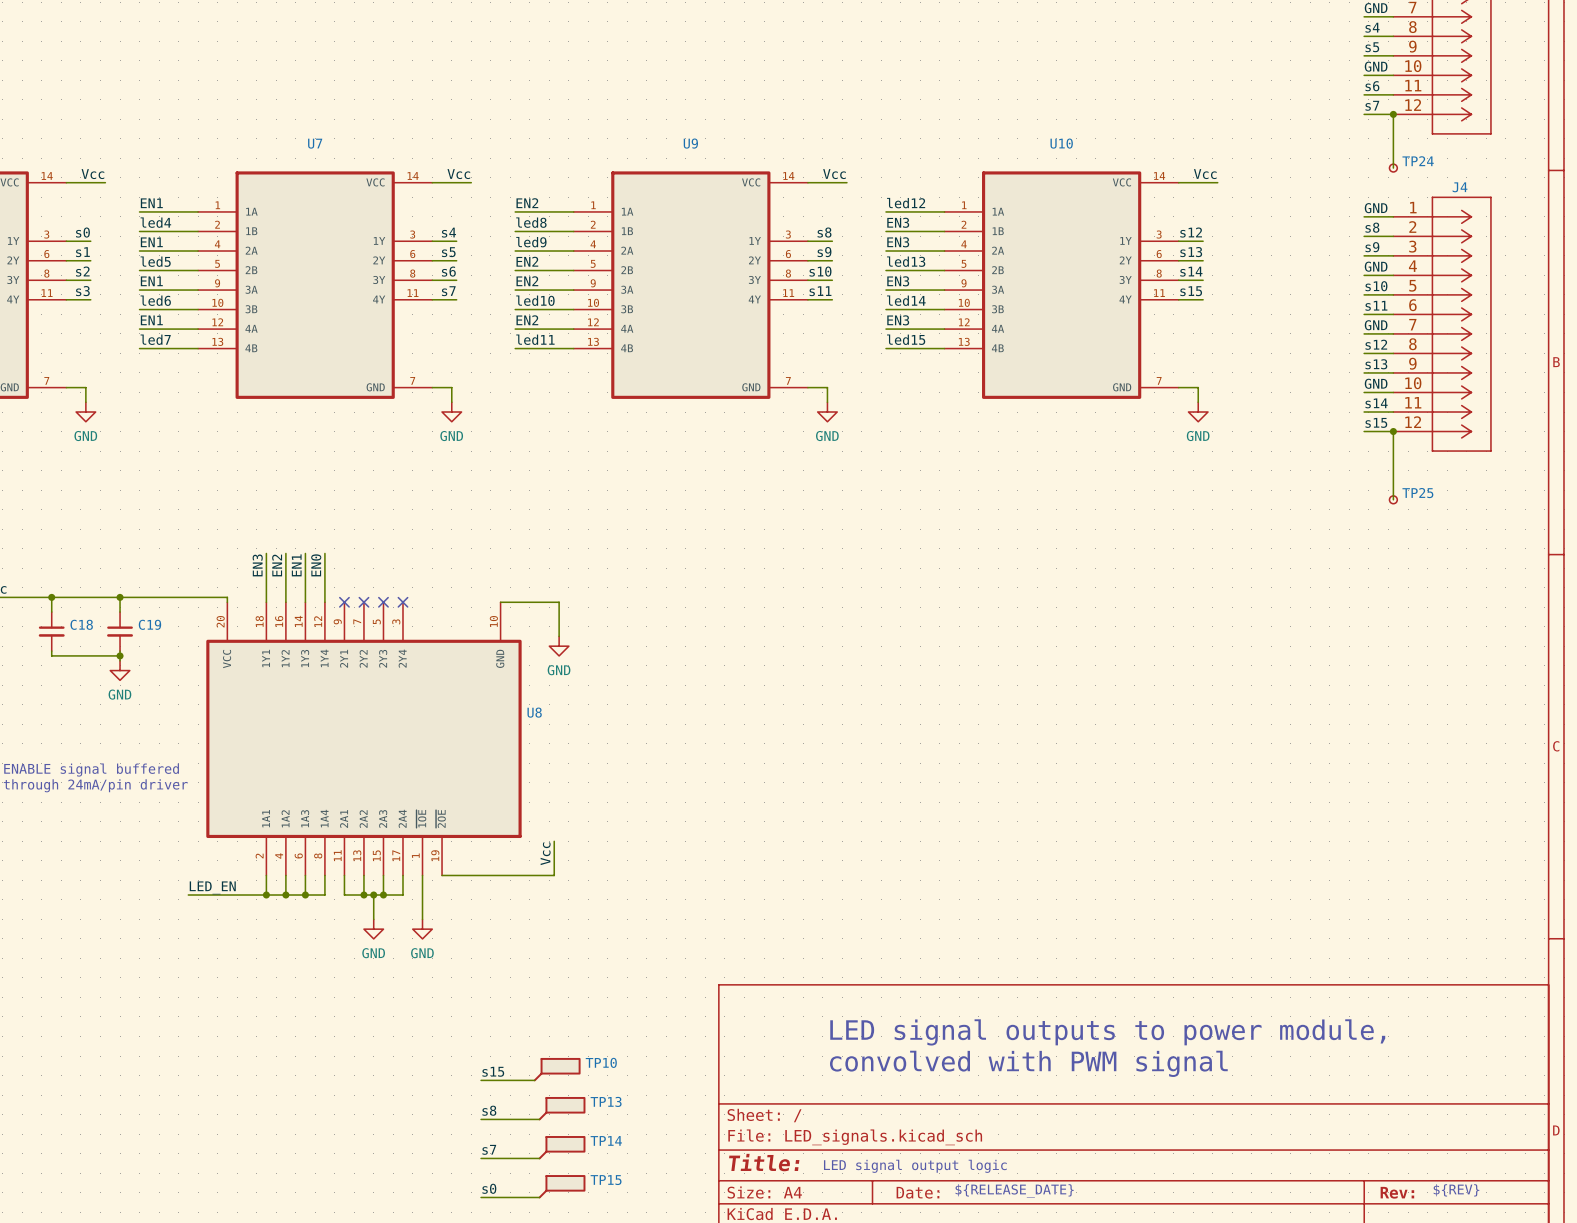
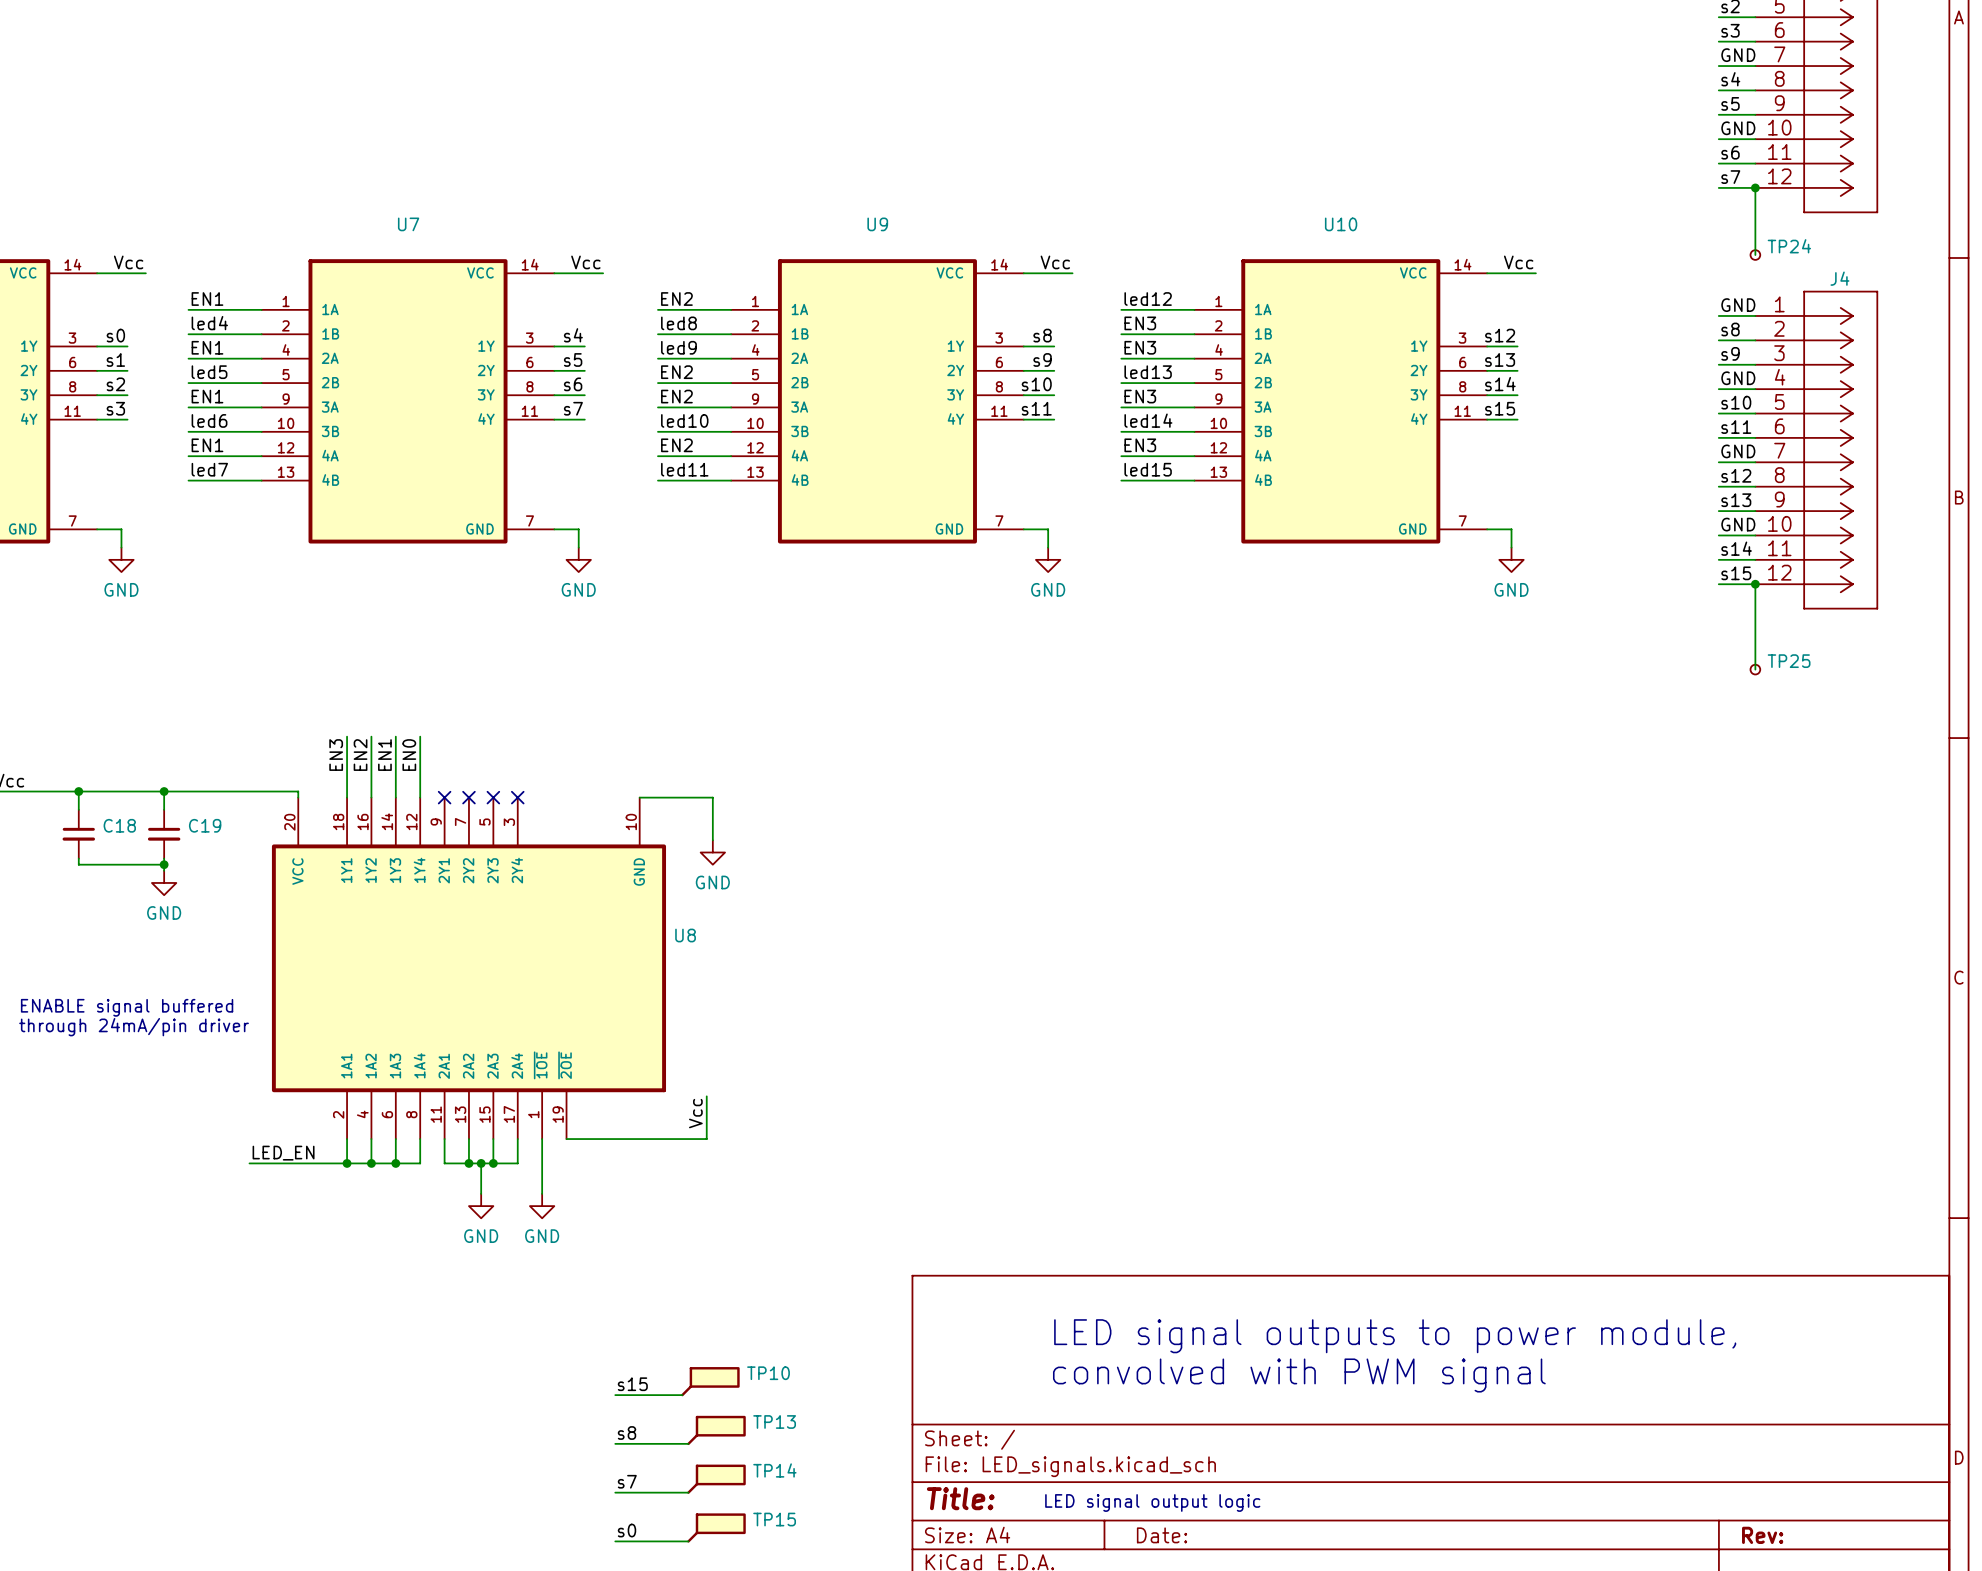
text: ${RELEASE_DATE} (1014, 1190) -> none
text: ${REV} (1456, 1190) -> none

